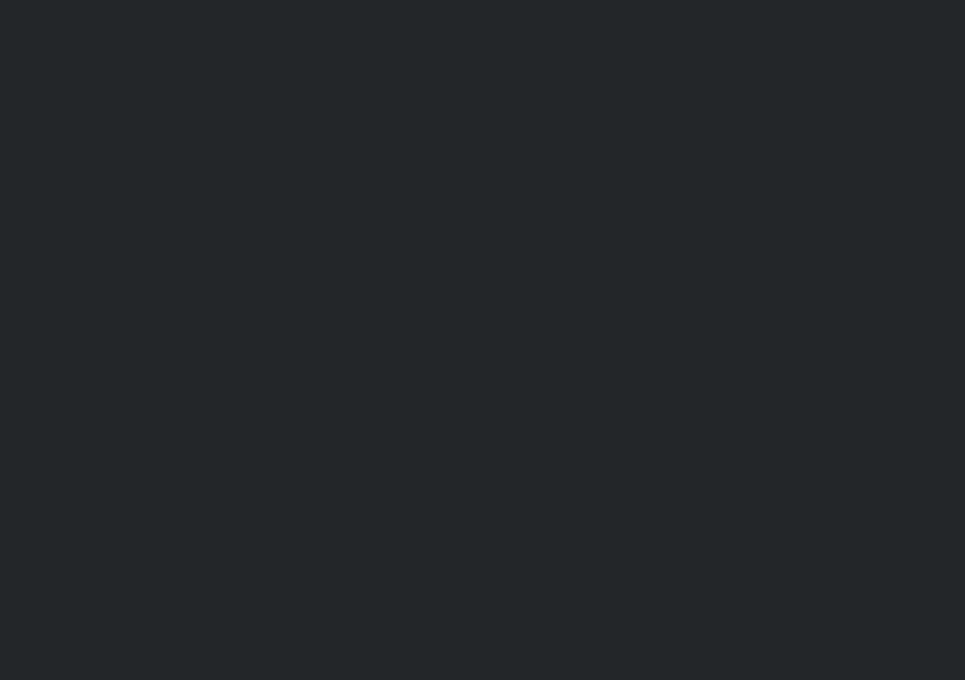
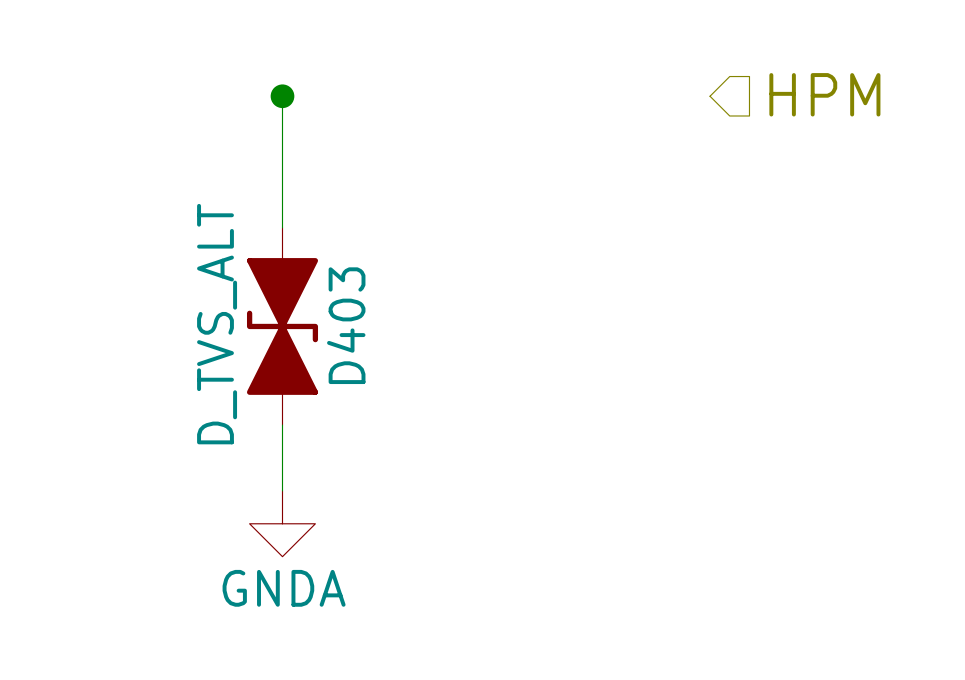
hierarchical label: none -> HPM (824, 94)
wire: none -> (282, 96) (282, 227)
junction: none -> (282, 96)
D403: none -> D_TVS_ALT (282, 326)
wire: none -> (282, 425) (282, 490)
power symbol: none -> GNDA (282, 523)

